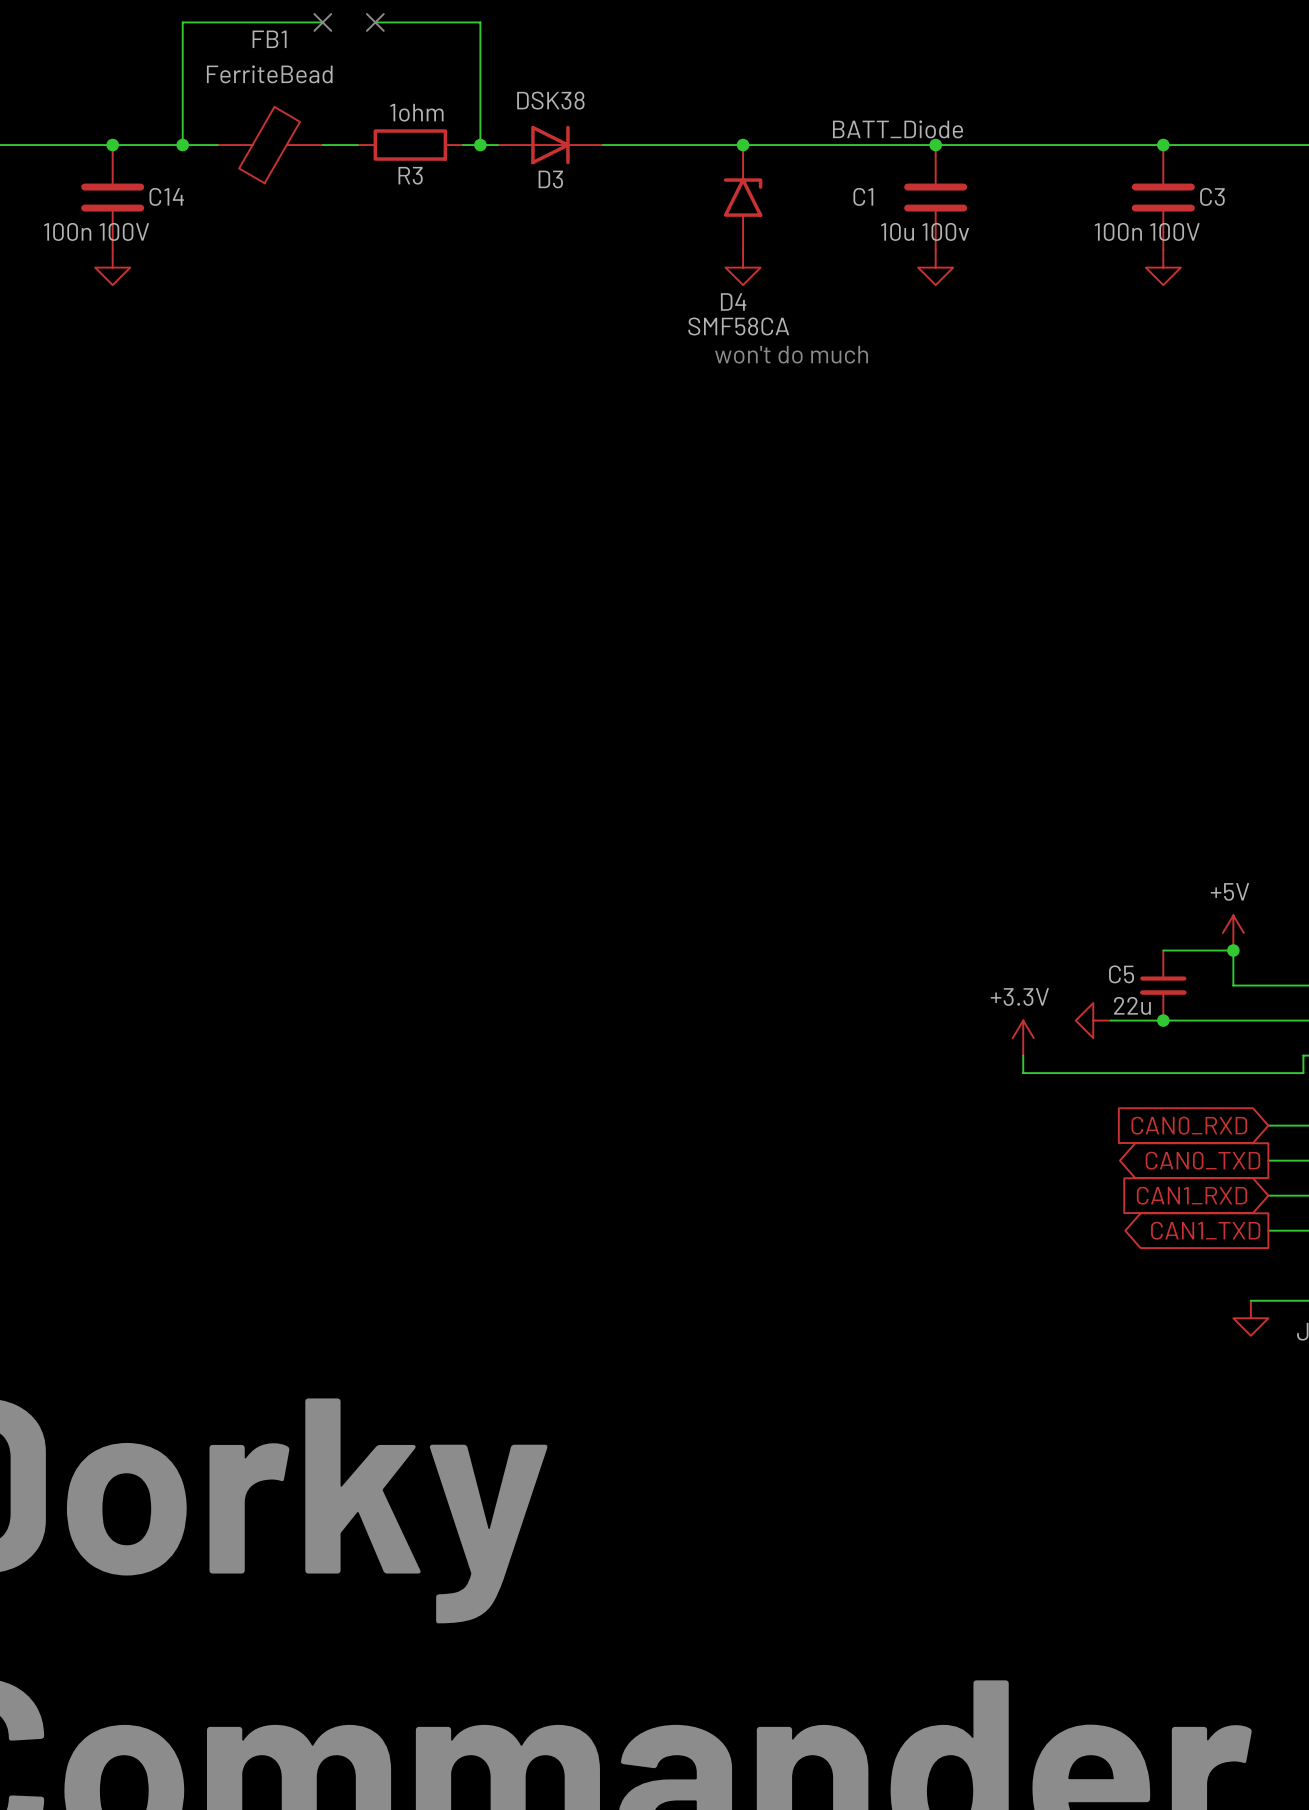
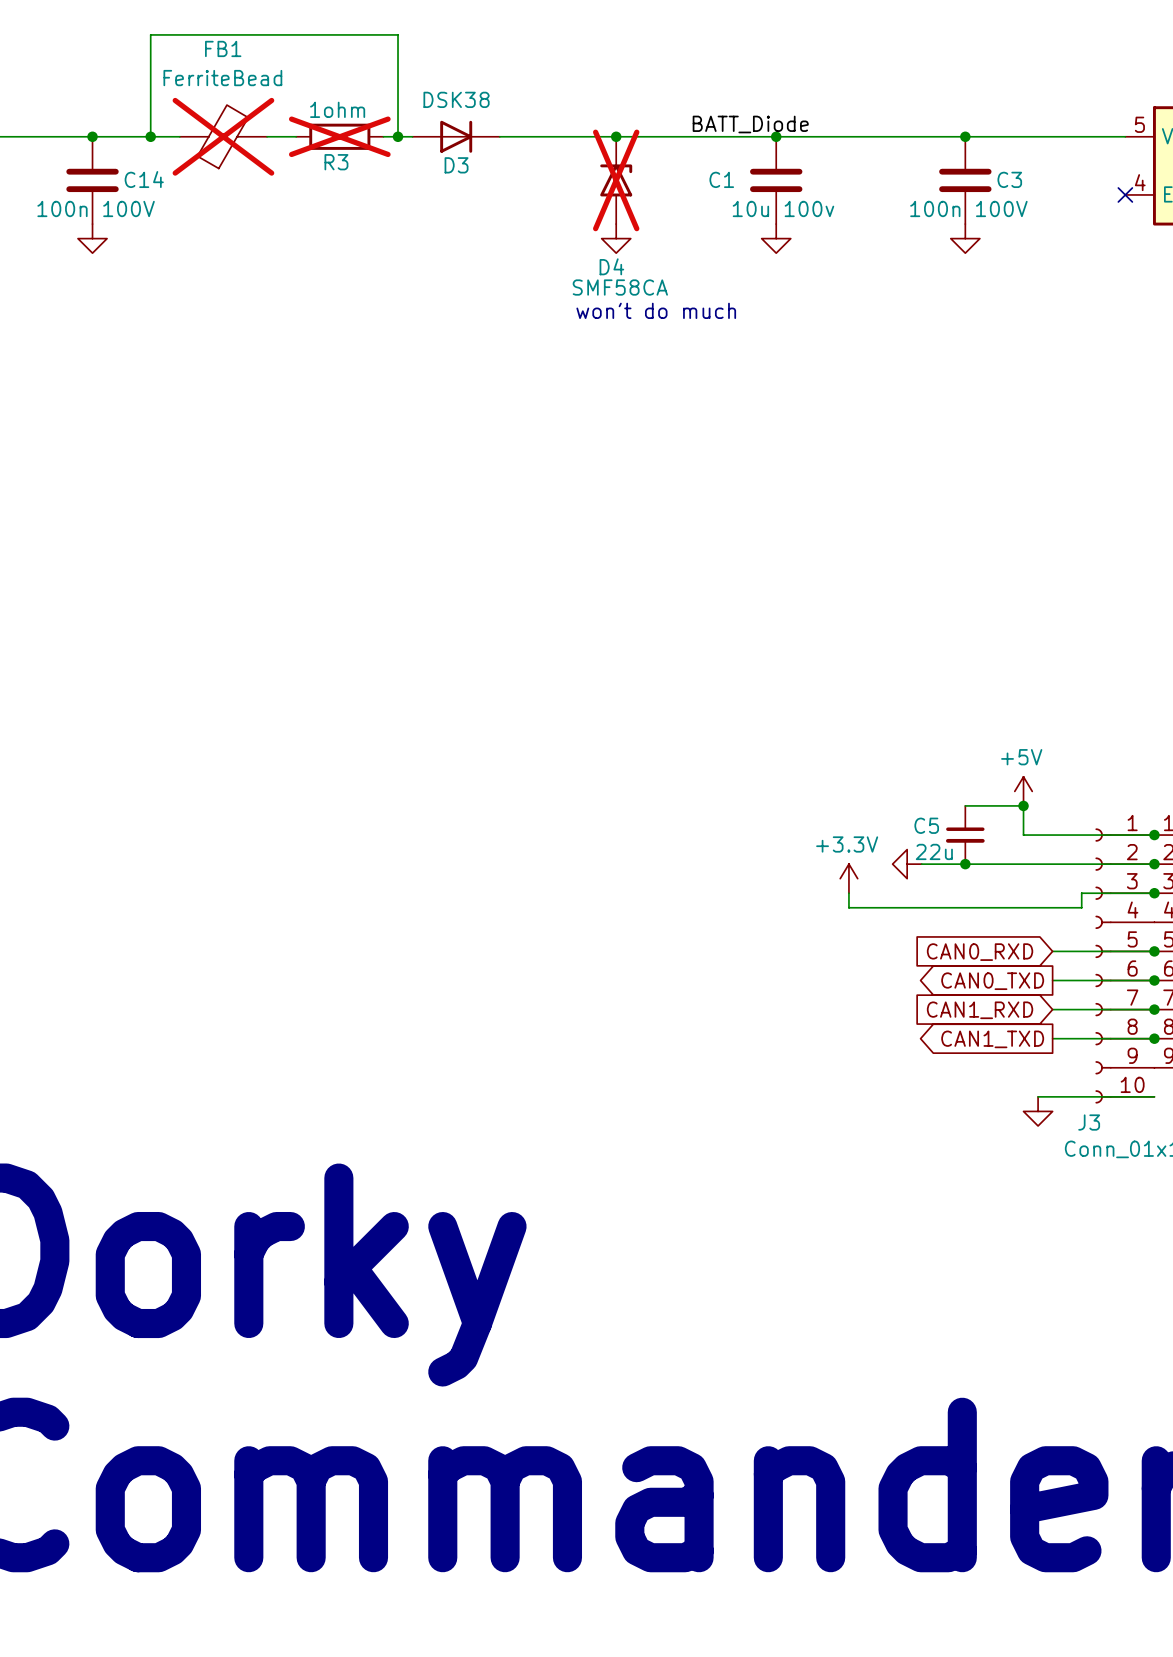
wire: none -> (267, 34) (310, 34)
no-connect mark: (322, 22) -> none
no-connect mark: (375, 22) -> none
FB1 do-not-place cross: none -> (223, 136)
R3 do-not-place cross: none -> (339, 136)
D4 do-not-place cross: none -> (616, 180)

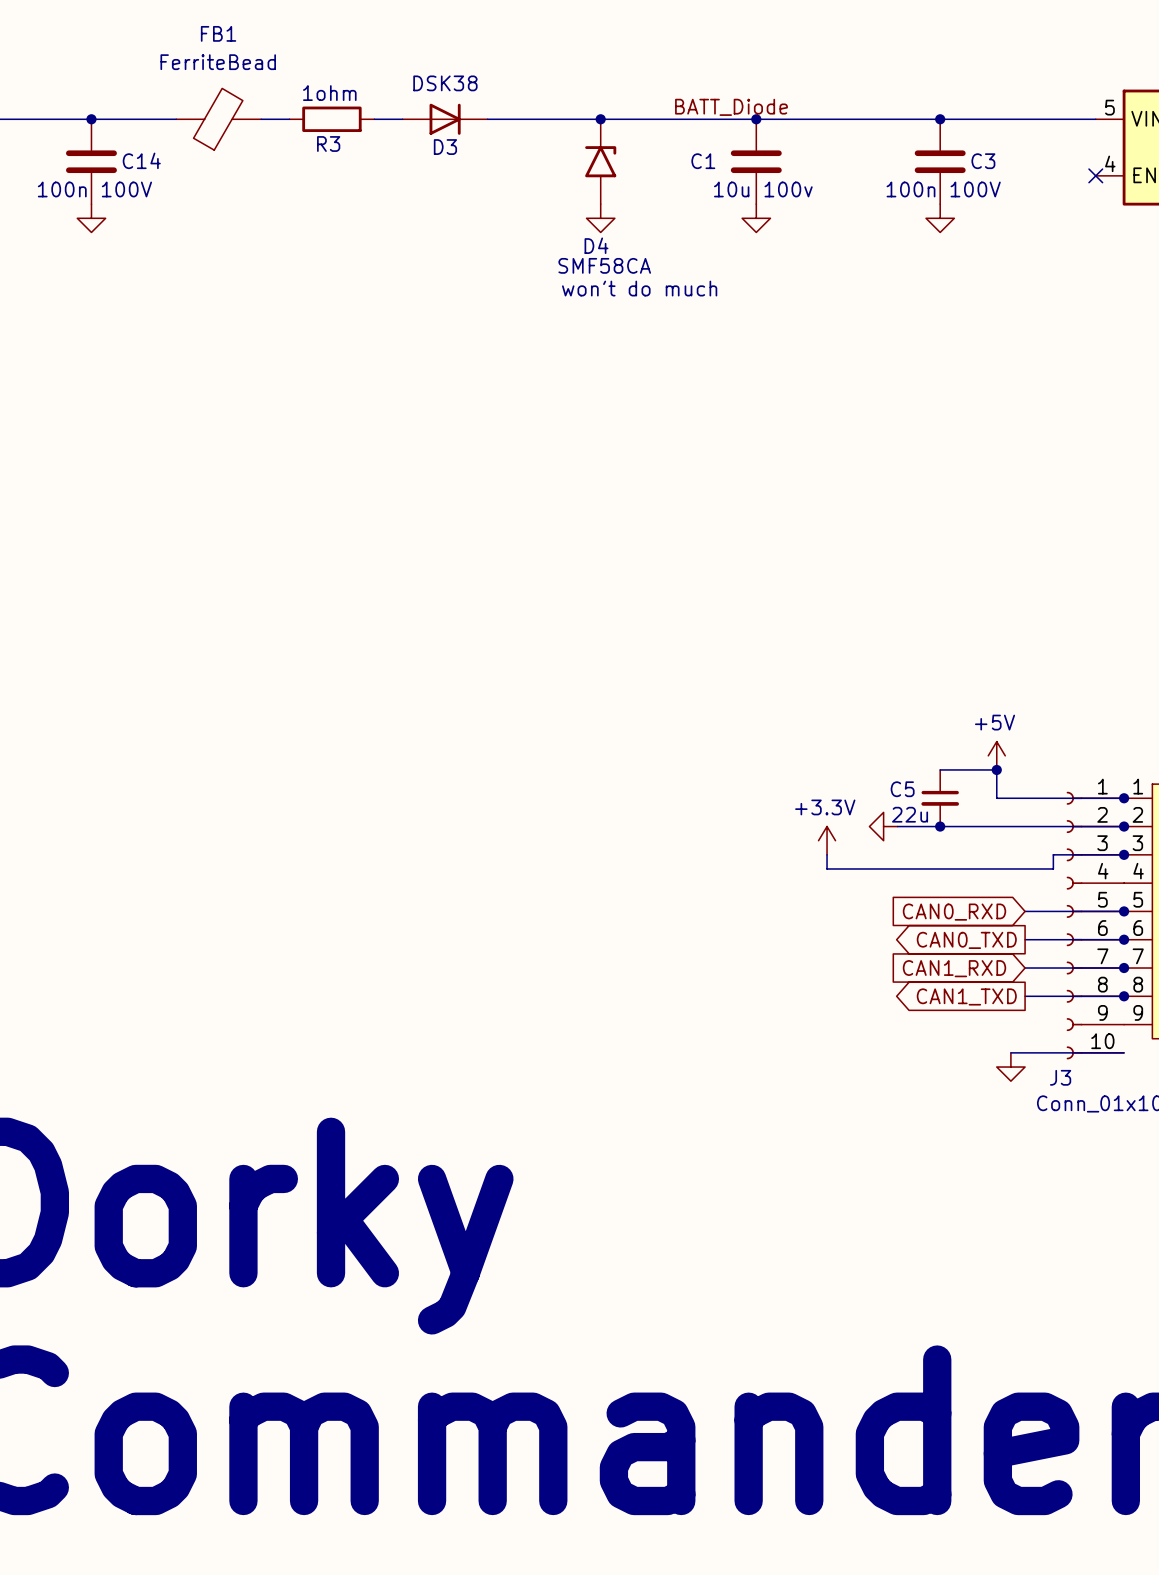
wire: (150, 136) (150, 34) (398, 34) (398, 136) -> none
junction: (150, 136) -> none
FB1 do-not-place cross: (223, 136) -> none
R3 do-not-place cross: (339, 136) -> none
junction: (398, 136) -> none
D4 do-not-place cross: (616, 180) -> none

